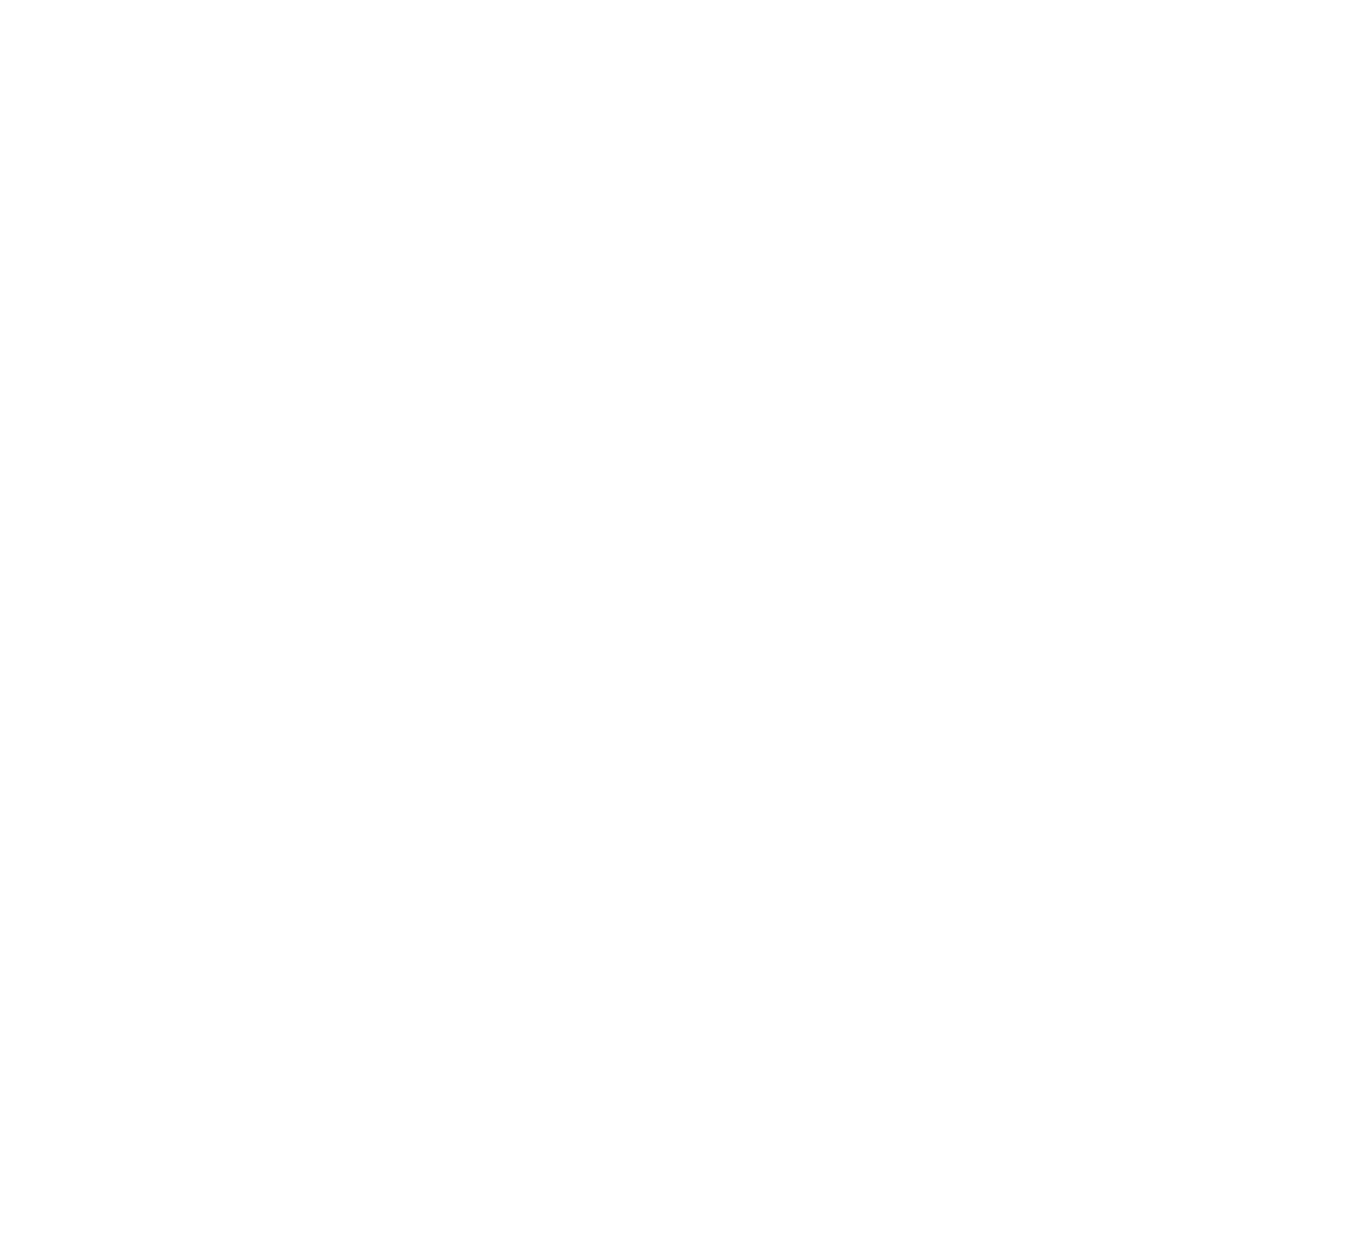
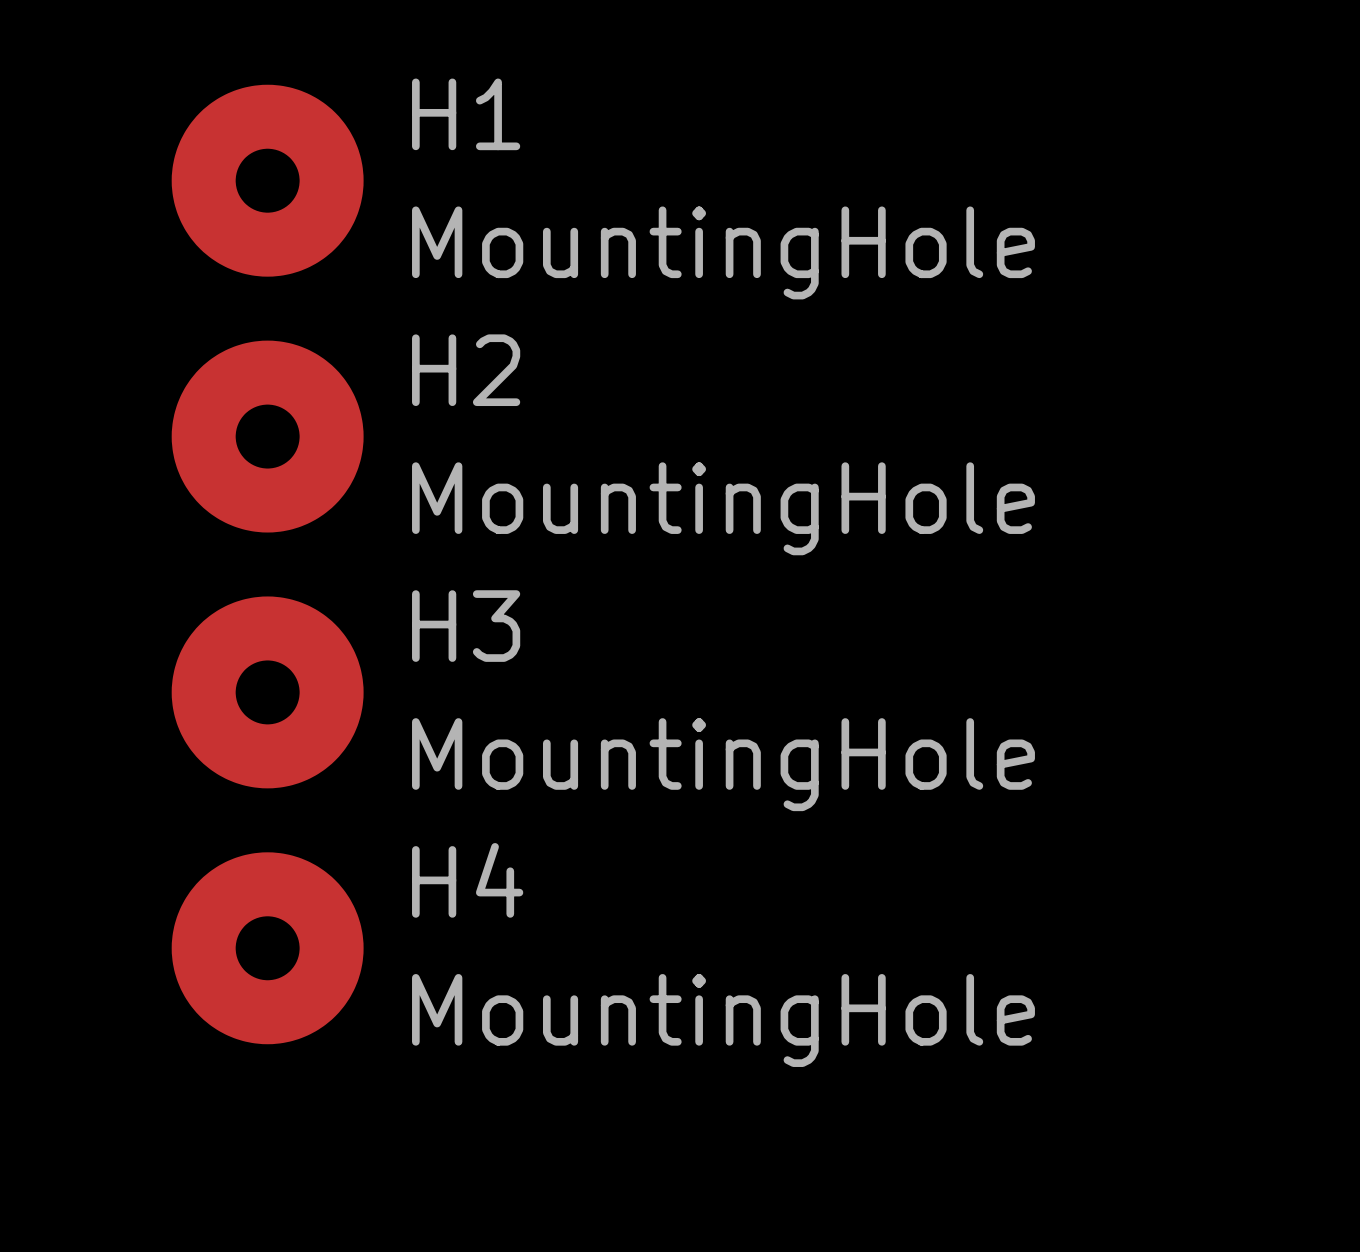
H1: none -> MountingHole (267, 180)
H2: none -> MountingHole (267, 436)
H3: none -> MountingHole (267, 692)
H4: none -> MountingHole (267, 948)

